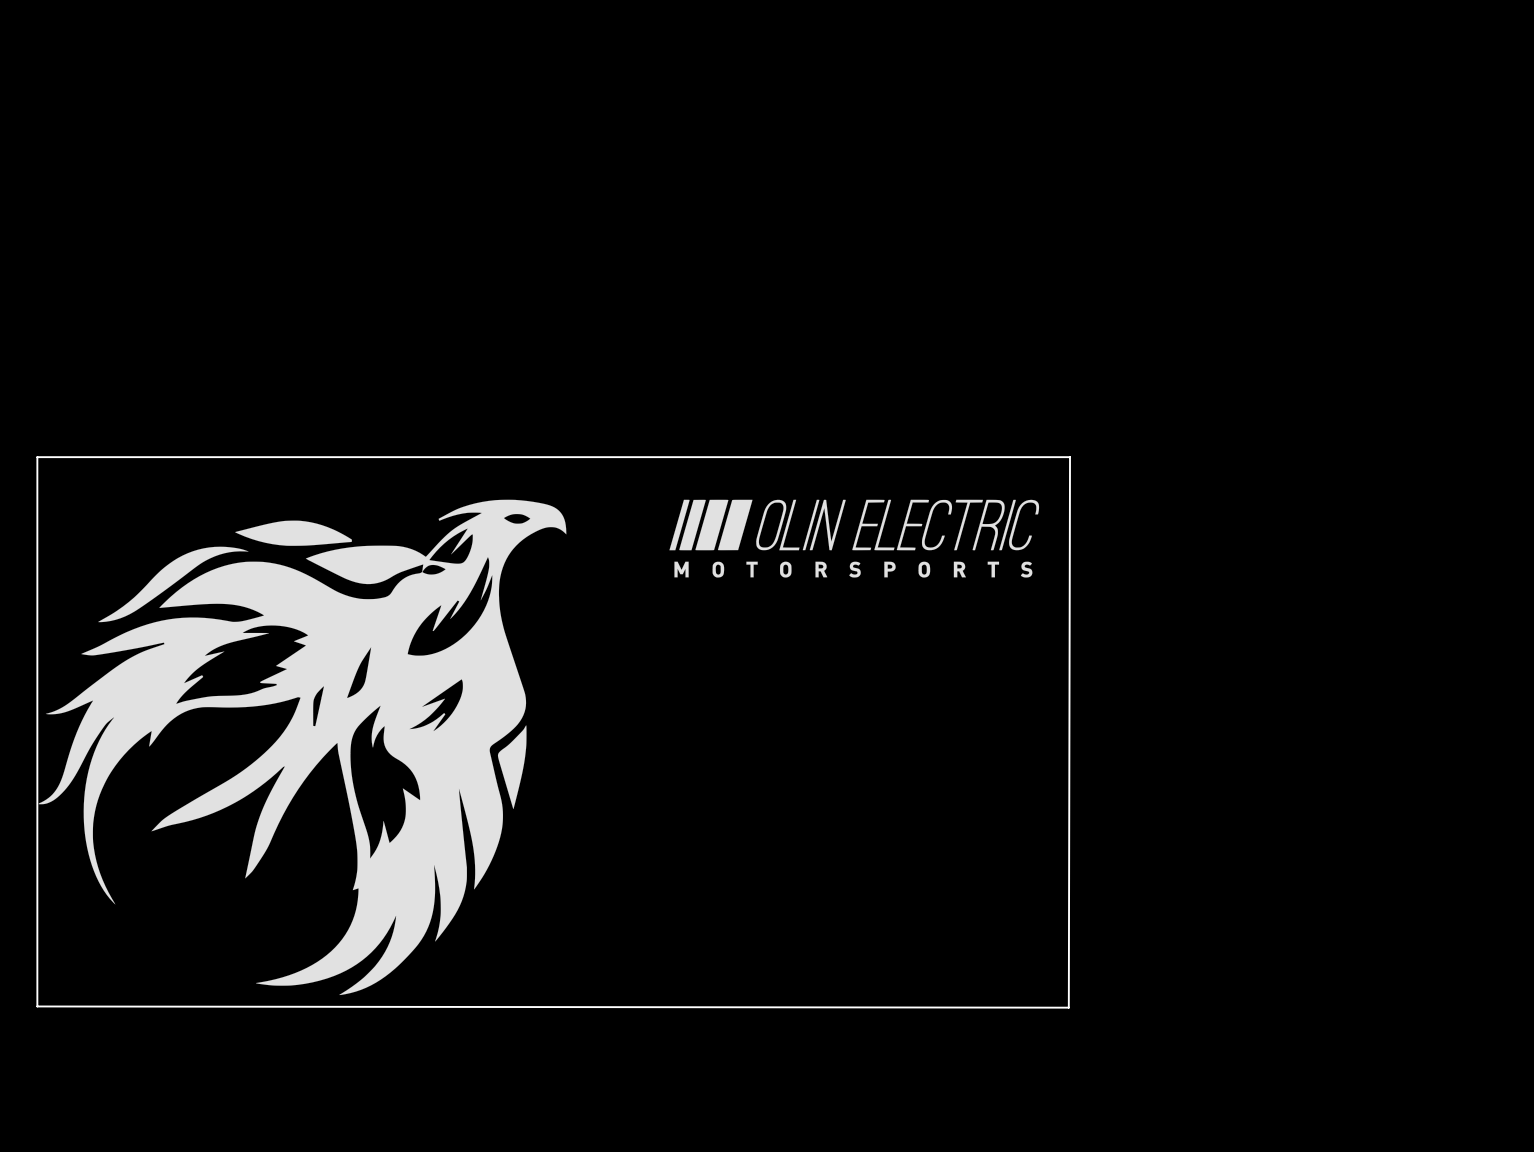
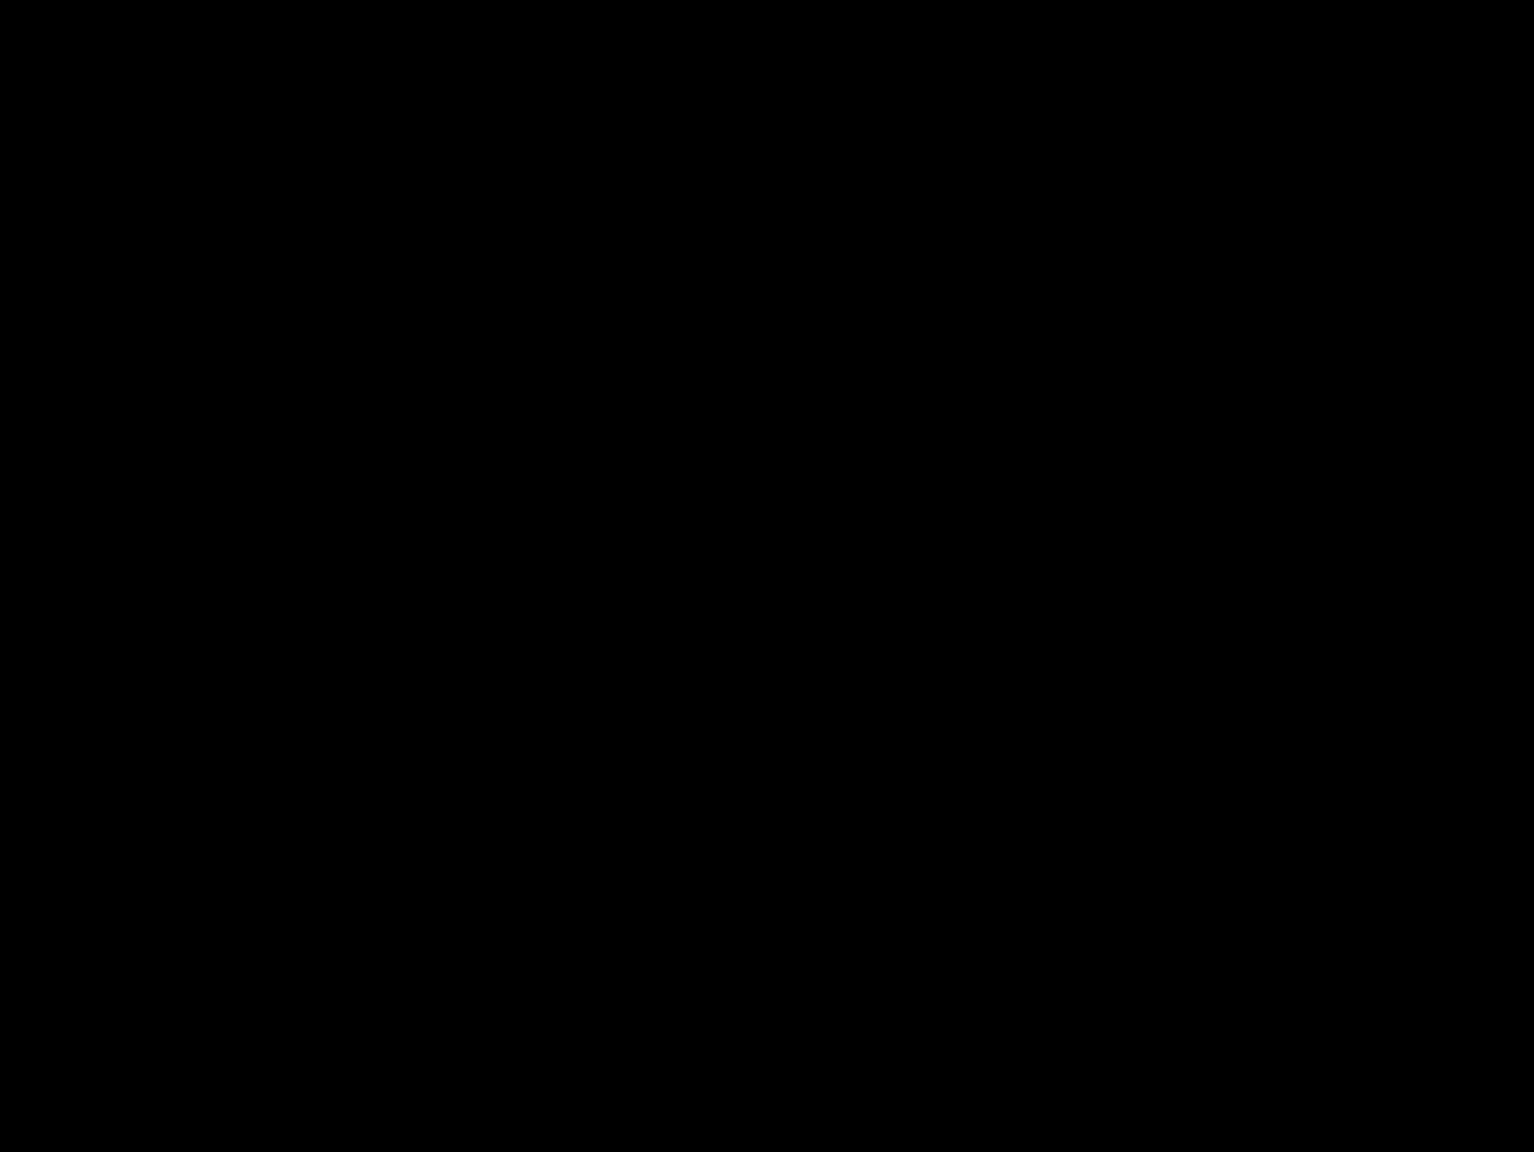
board edge: (1070, 457) (1068, 1007) (37, 1006) (37, 457) (1070, 457) -> none
drawing: [38, 499, 567, 996] -> none
drawing: [669, 499, 1040, 578] -> none

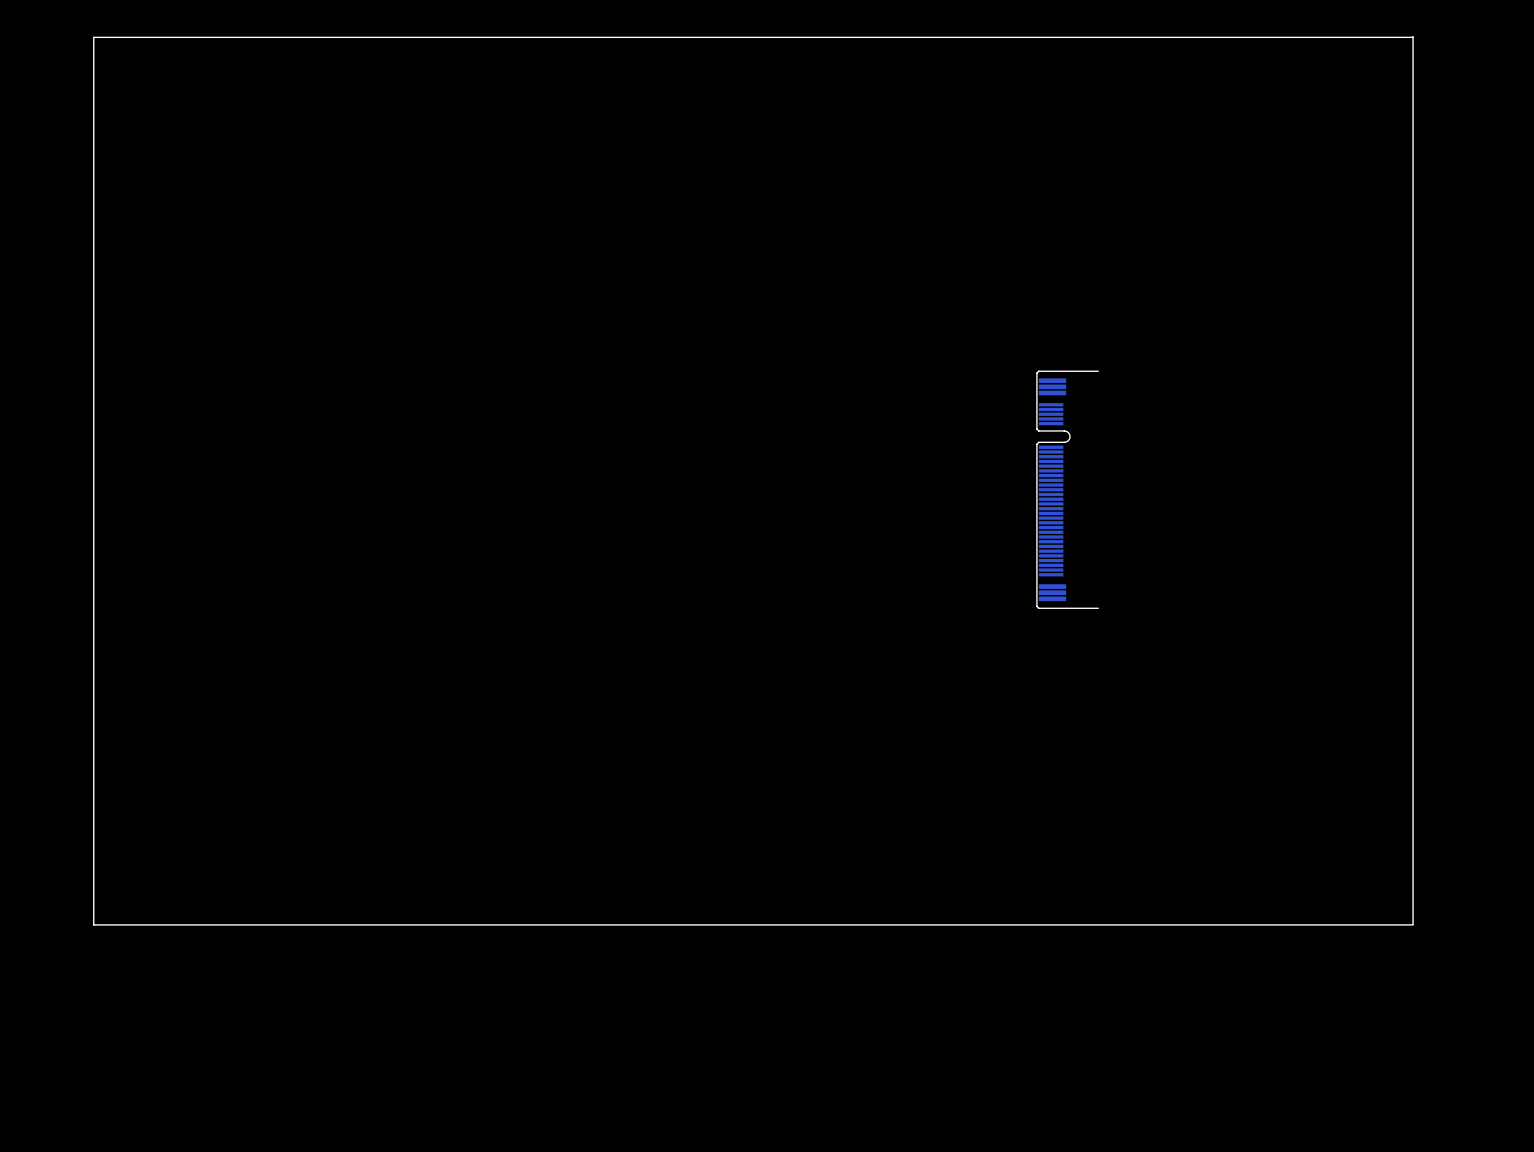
board edge: none -> (1413, 36) (1413, 924)
board edge: none -> (1413, 37) (93, 37) (93, 924) (1413, 924)
part: none -> (1067, 489)

